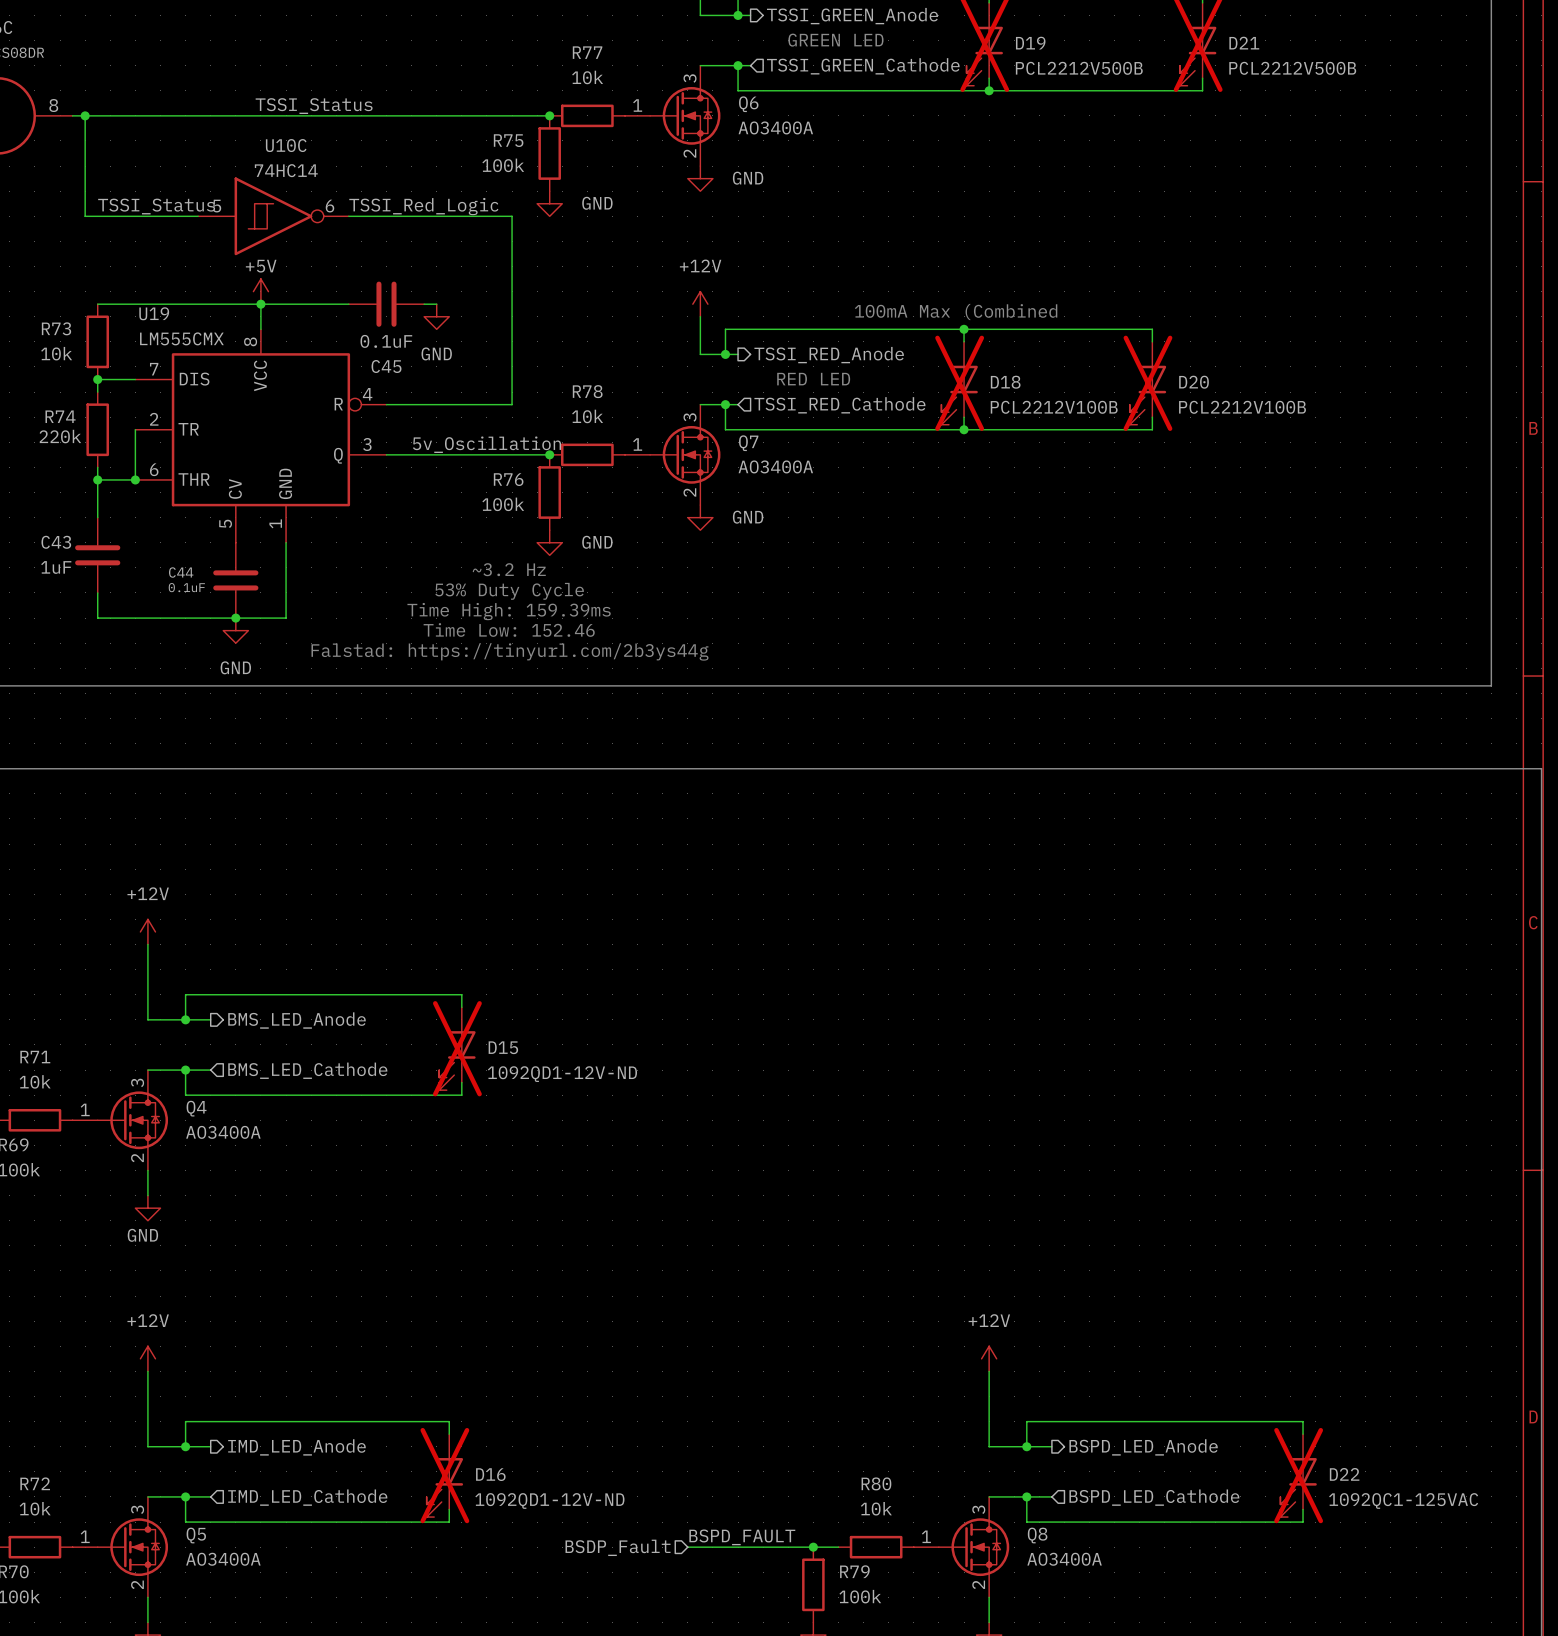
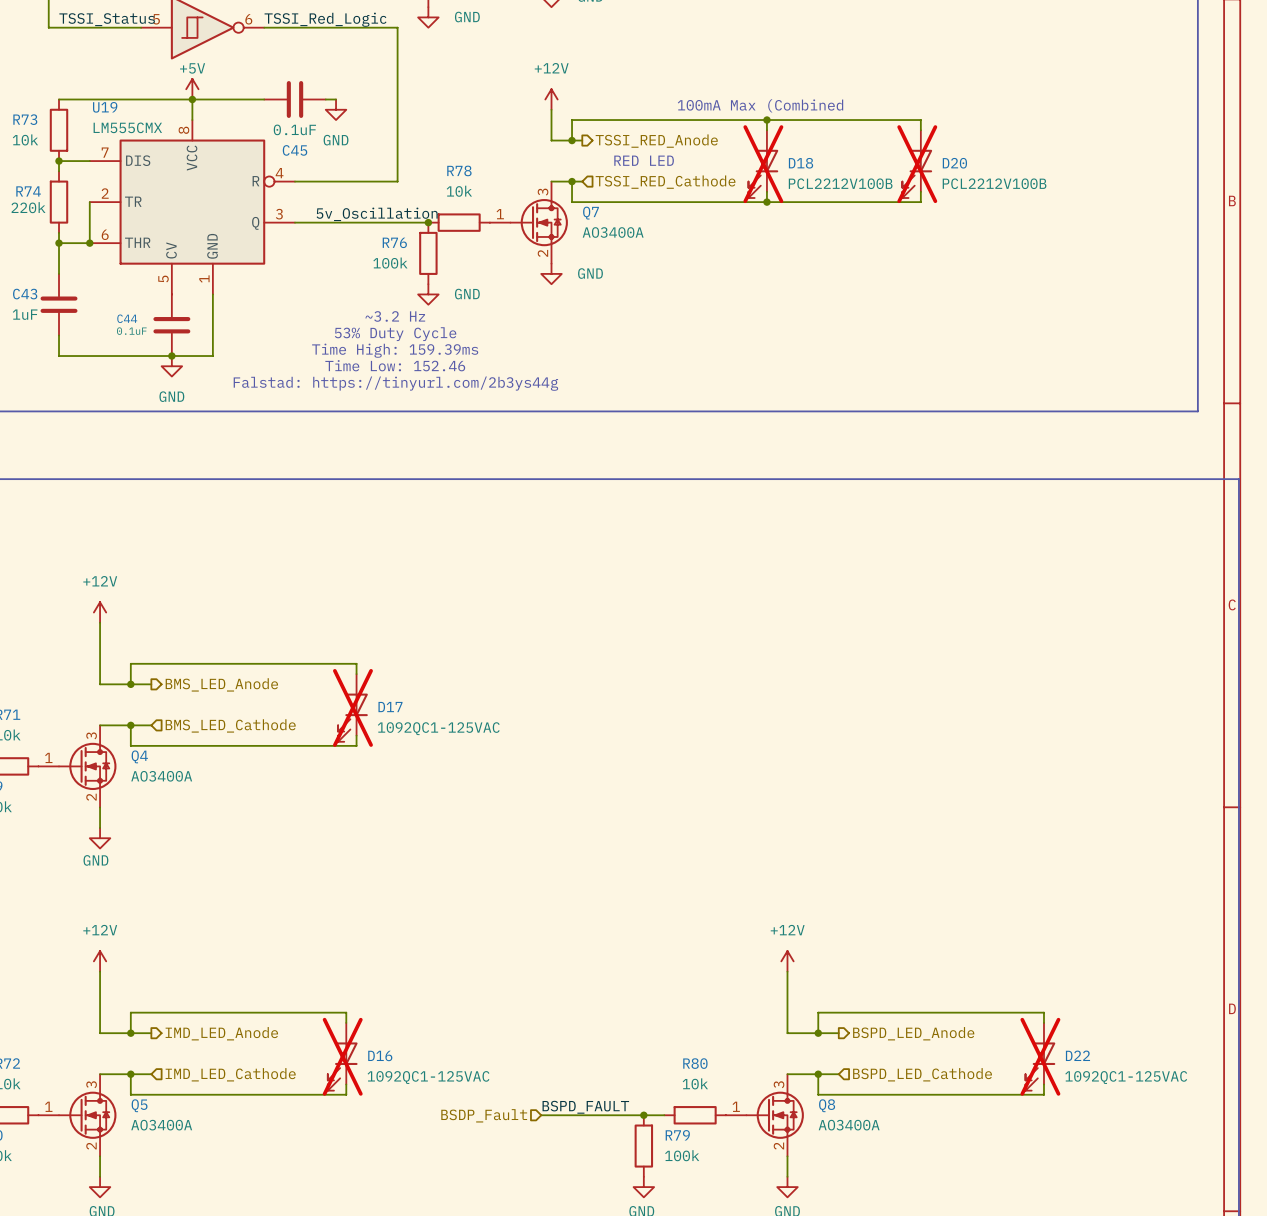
D15 name: D15 (503, 1047) -> D17 (390, 707)
D15 value: 1092QD1-12V-ND (562, 1074) -> 1092QC1-125VAC (438, 728)
D16 value: 1092QD1-12V-ND (549, 1500) -> 1092QC1-125VAC (428, 1077)

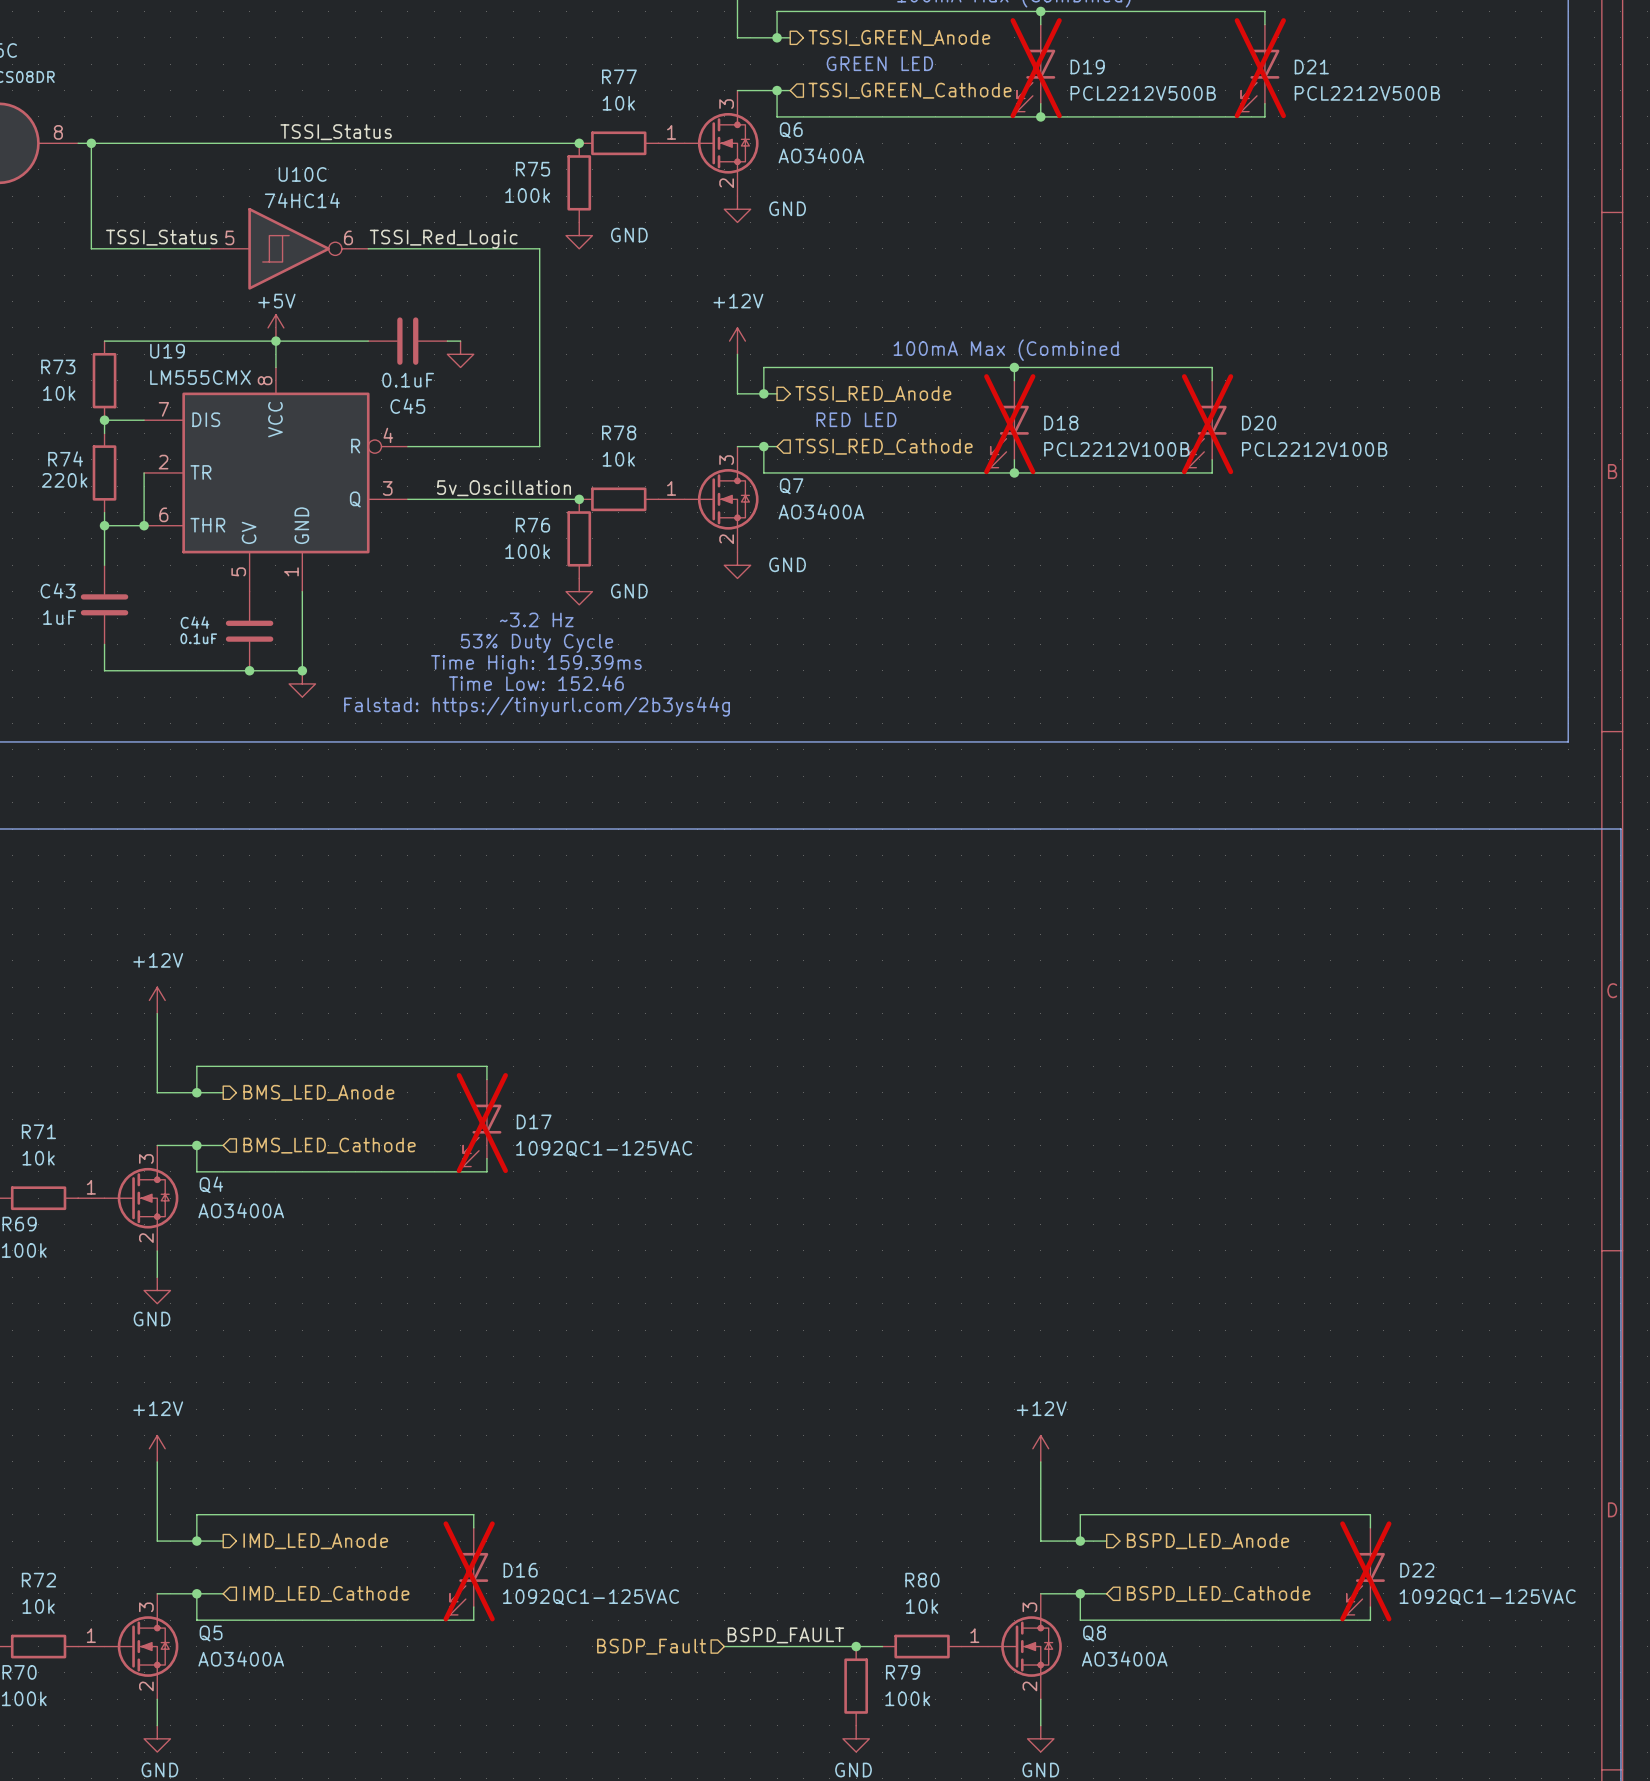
power symbol text: GND (336, 140) -> none
junction: none -> (302, 670)
power symbol: GND (171, 366) -> none
power symbol: none -> (302, 683)

